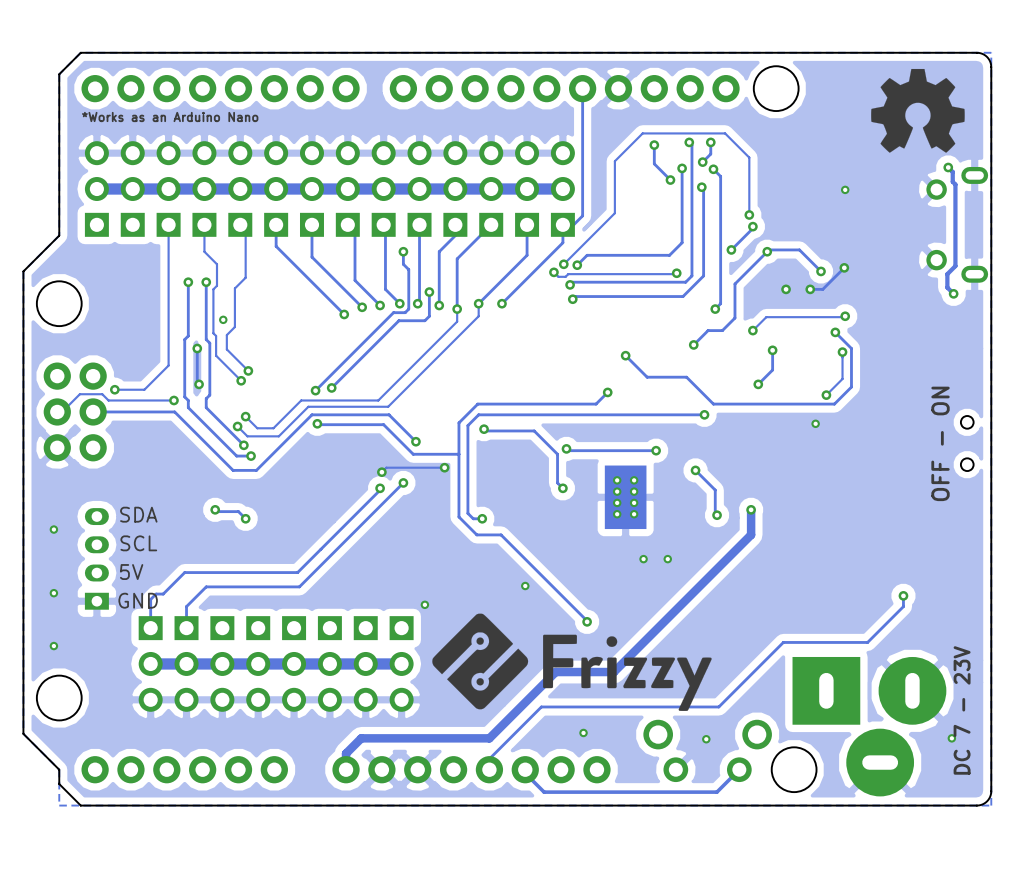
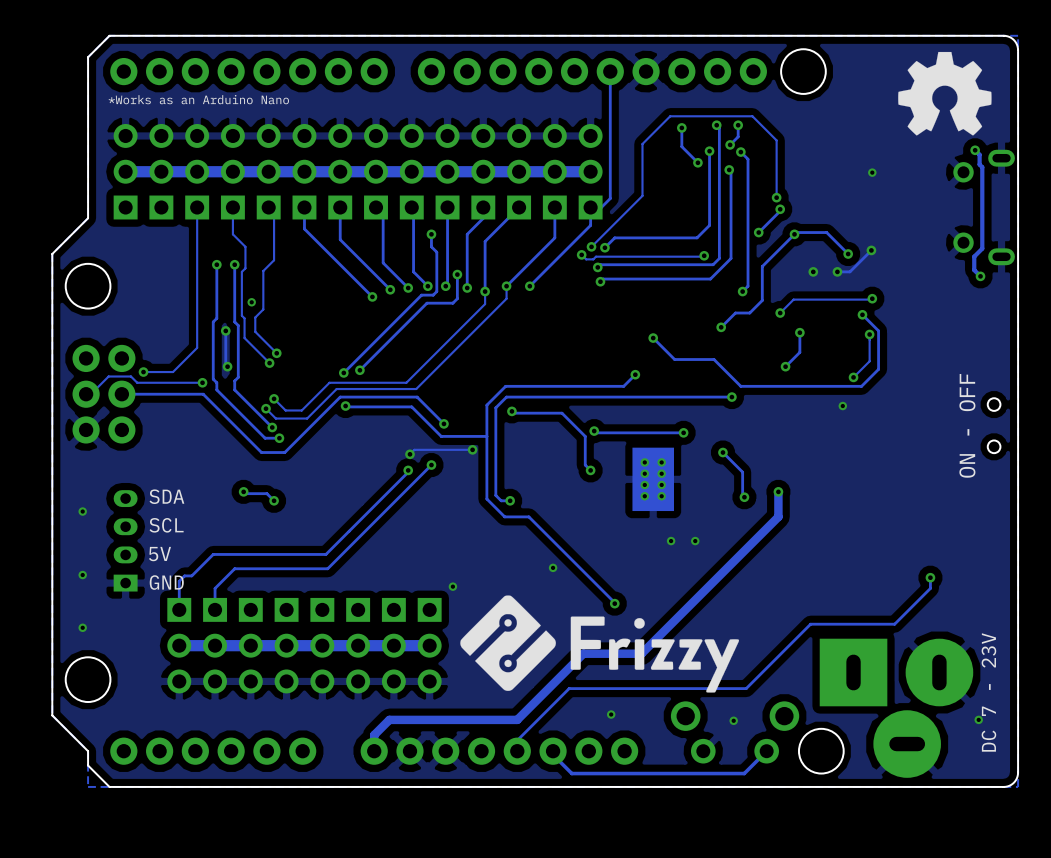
text: OFF - ON (940, 443) -> ON - OFF (967, 425)

